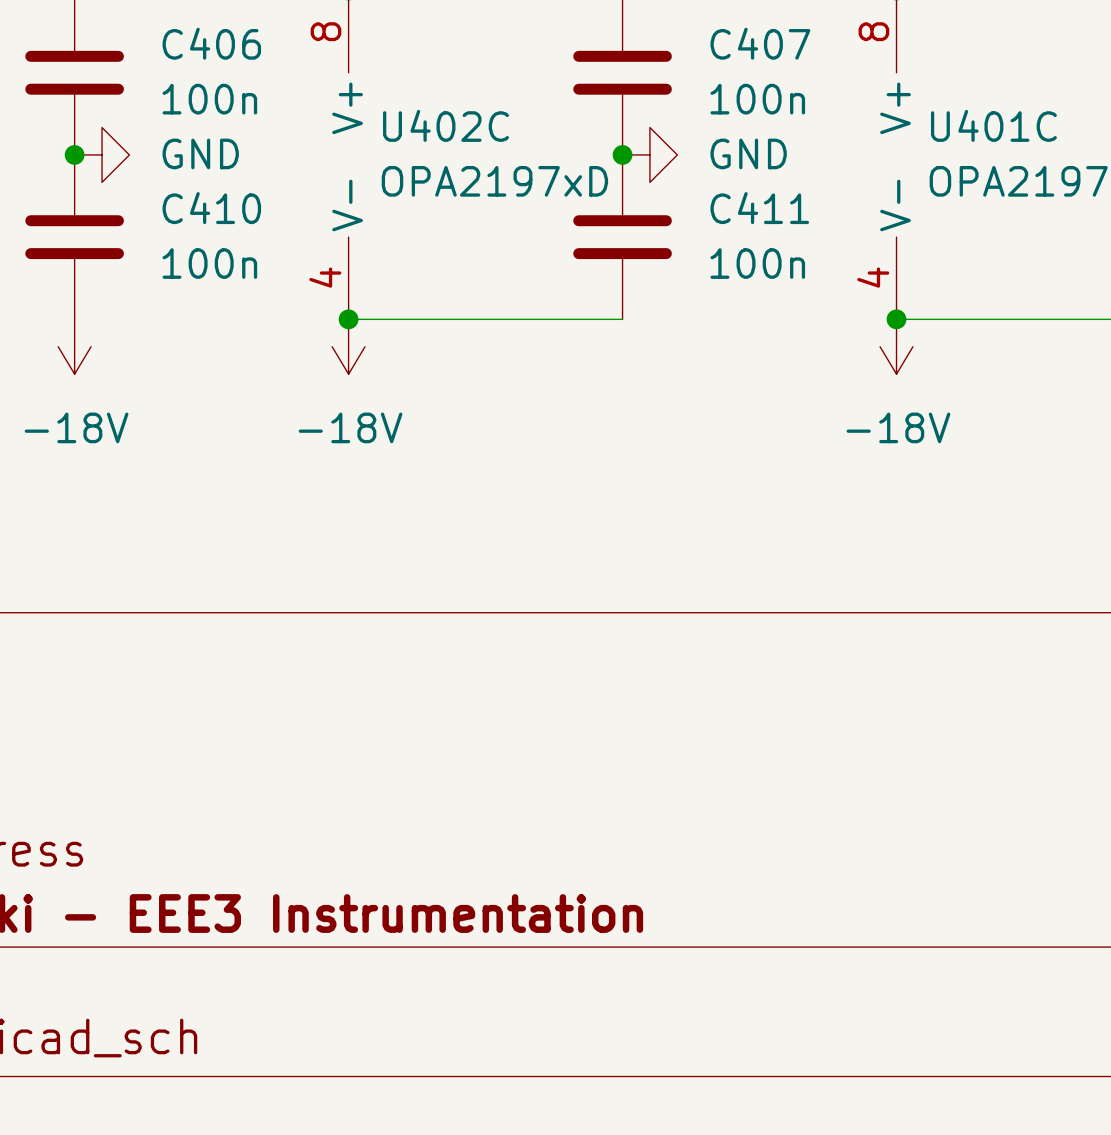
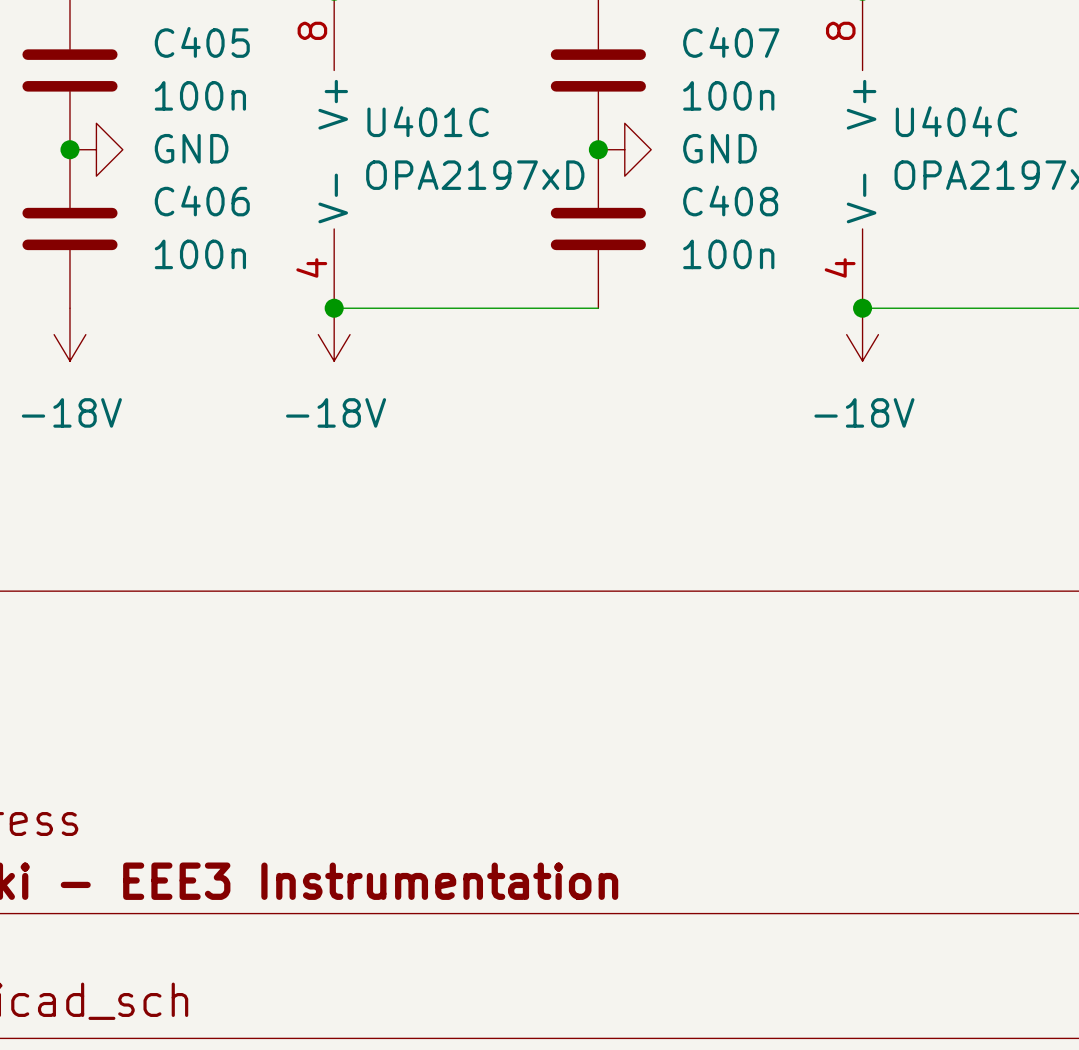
C406 name: C406 (211, 43) -> C405 (202, 42)
U402C name: U402C (445, 125) -> U401C (428, 121)
U401C name: U401C (993, 125) -> U404C (956, 121)
C410 name: C410 (211, 208) -> C406 (202, 200)
C411 name: C411 (759, 208) -> C408 (730, 200)

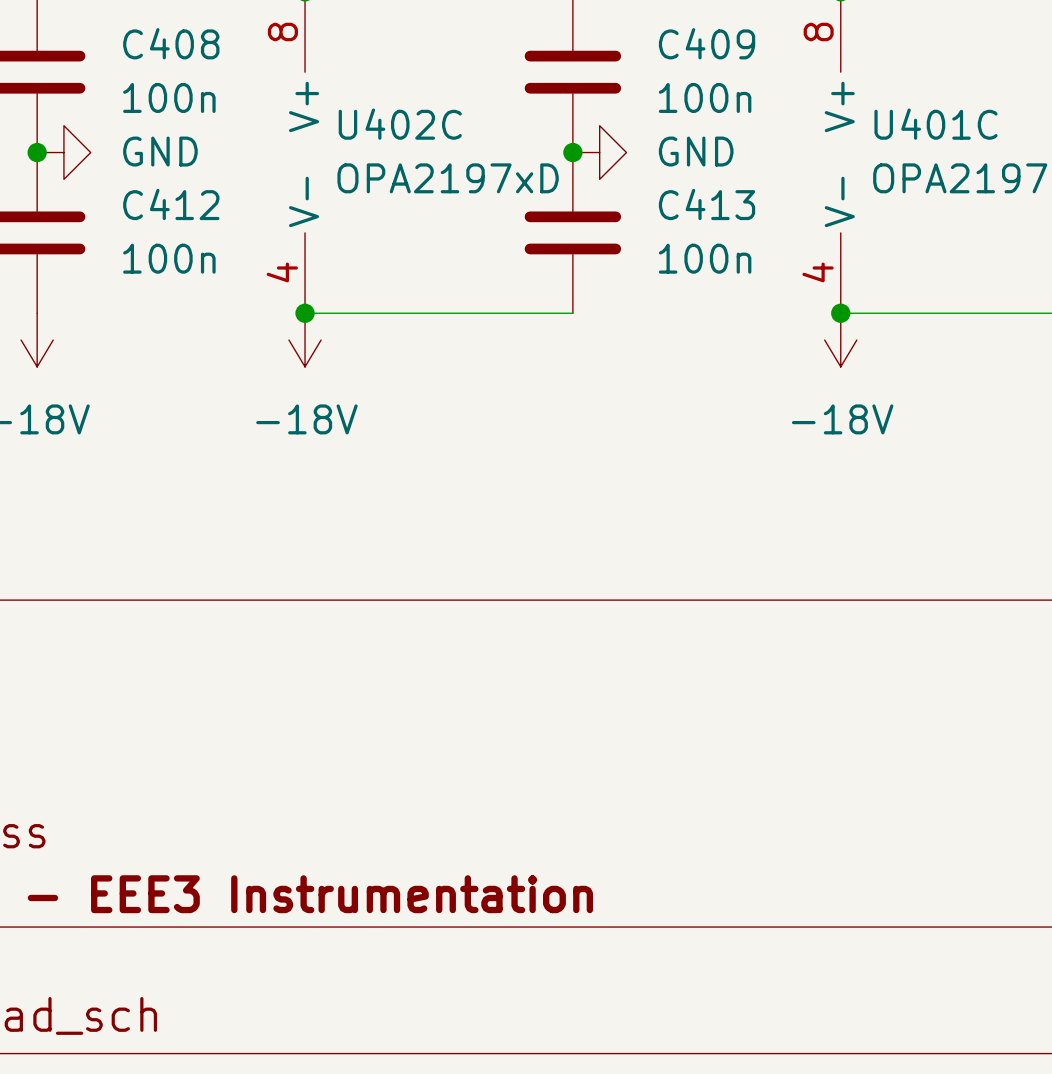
C405 name: C405 (202, 42) -> C408 (171, 43)
C407 name: C407 (731, 42) -> C409 (707, 43)
U401C name: U401C (428, 121) -> U402C (400, 124)
U404C name: U404C (956, 121) -> U401C (935, 124)
C406 name: C406 (202, 200) -> C412 (171, 204)
C408 name: C408 (730, 200) -> C413 (707, 204)

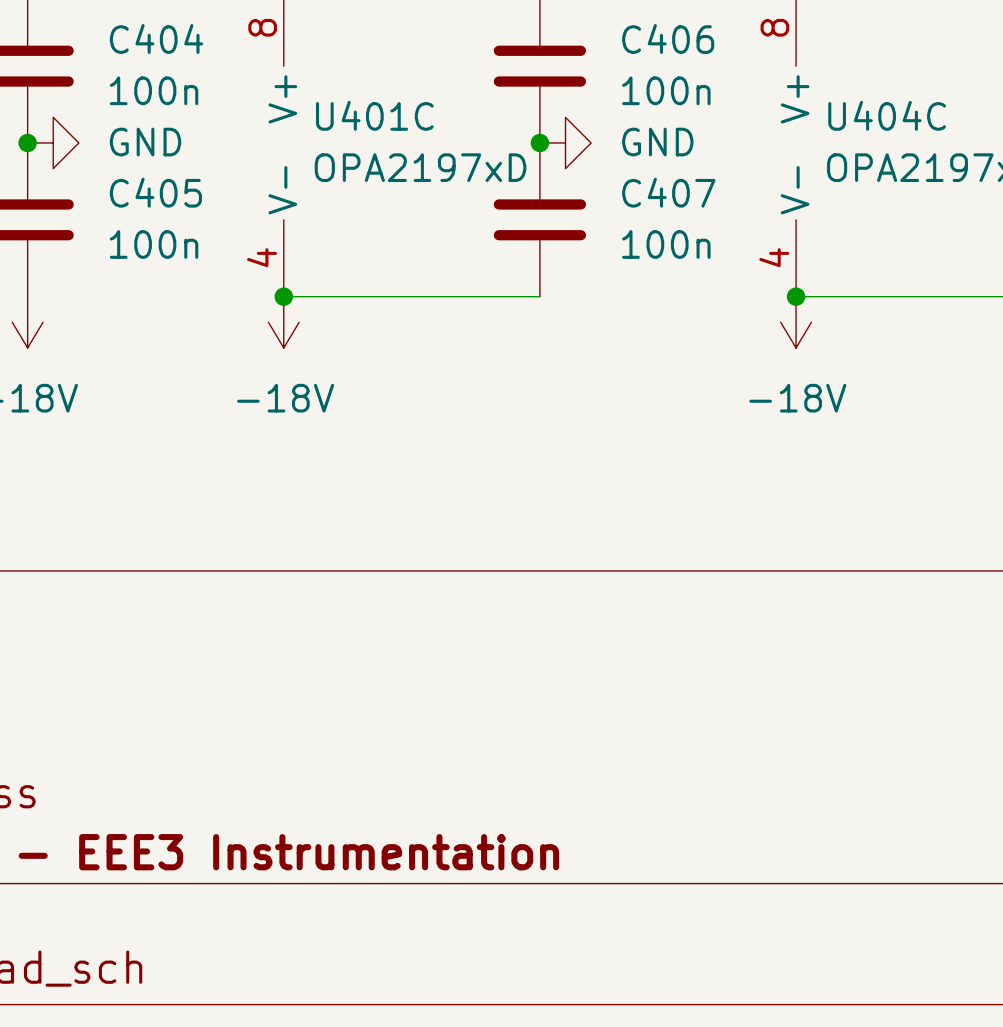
C408 name: C408 (171, 43) -> C404 (156, 38)
C409 name: C409 (707, 43) -> C406 (668, 38)
U402C name: U402C (400, 124) -> U401C (374, 115)
U401C name: U401C (935, 124) -> U404C (887, 115)
C412 name: C412 (171, 204) -> C405 (155, 192)
C413 name: C413 (707, 204) -> C407 (668, 192)

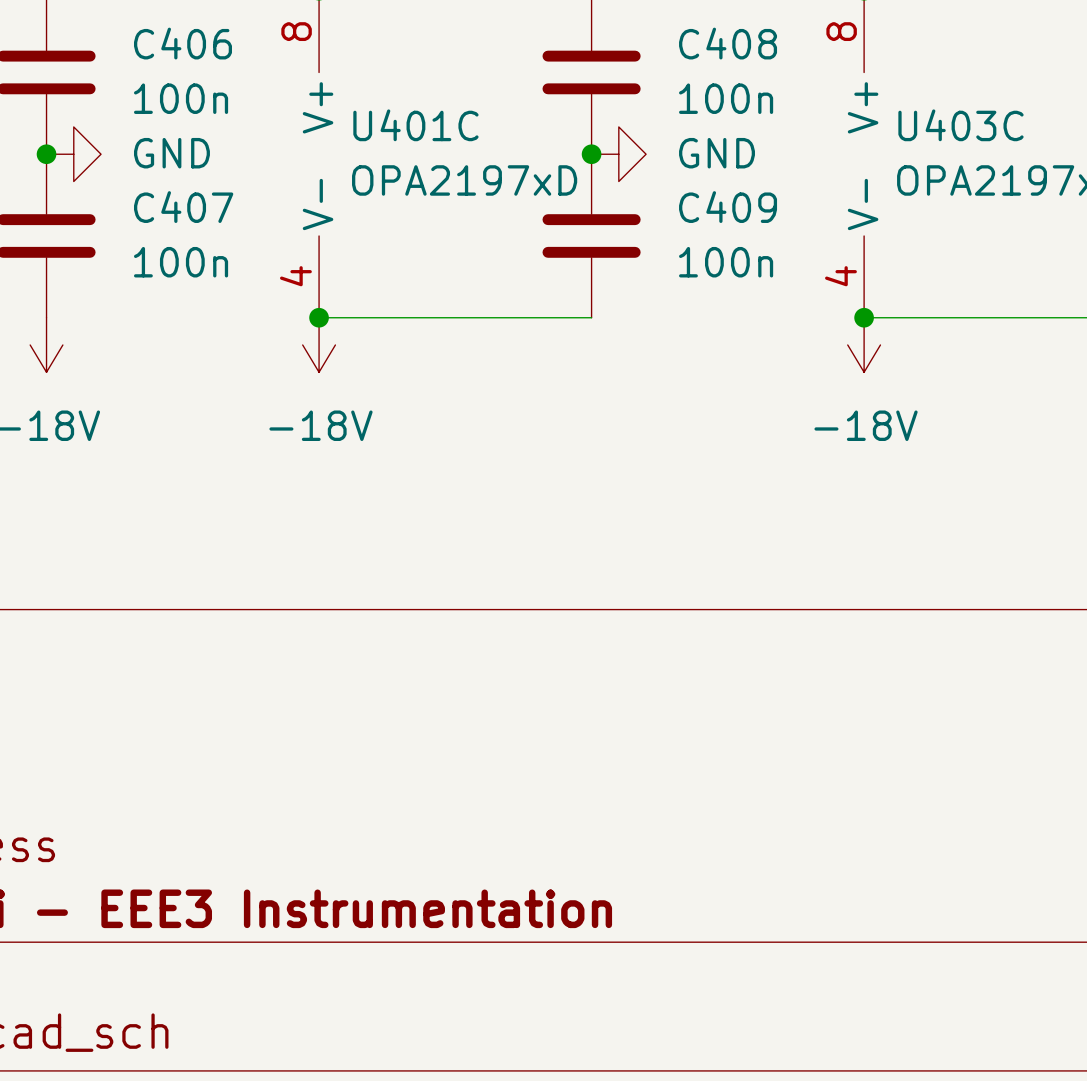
C404 name: C404 (156, 38) -> C406 (182, 43)
C406 name: C406 (668, 38) -> C408 (728, 43)
U404C name: U404C (887, 115) -> U403C (960, 125)
C405 name: C405 (155, 192) -> C407 (183, 207)
C407 name: C407 (668, 192) -> C409 (728, 207)

